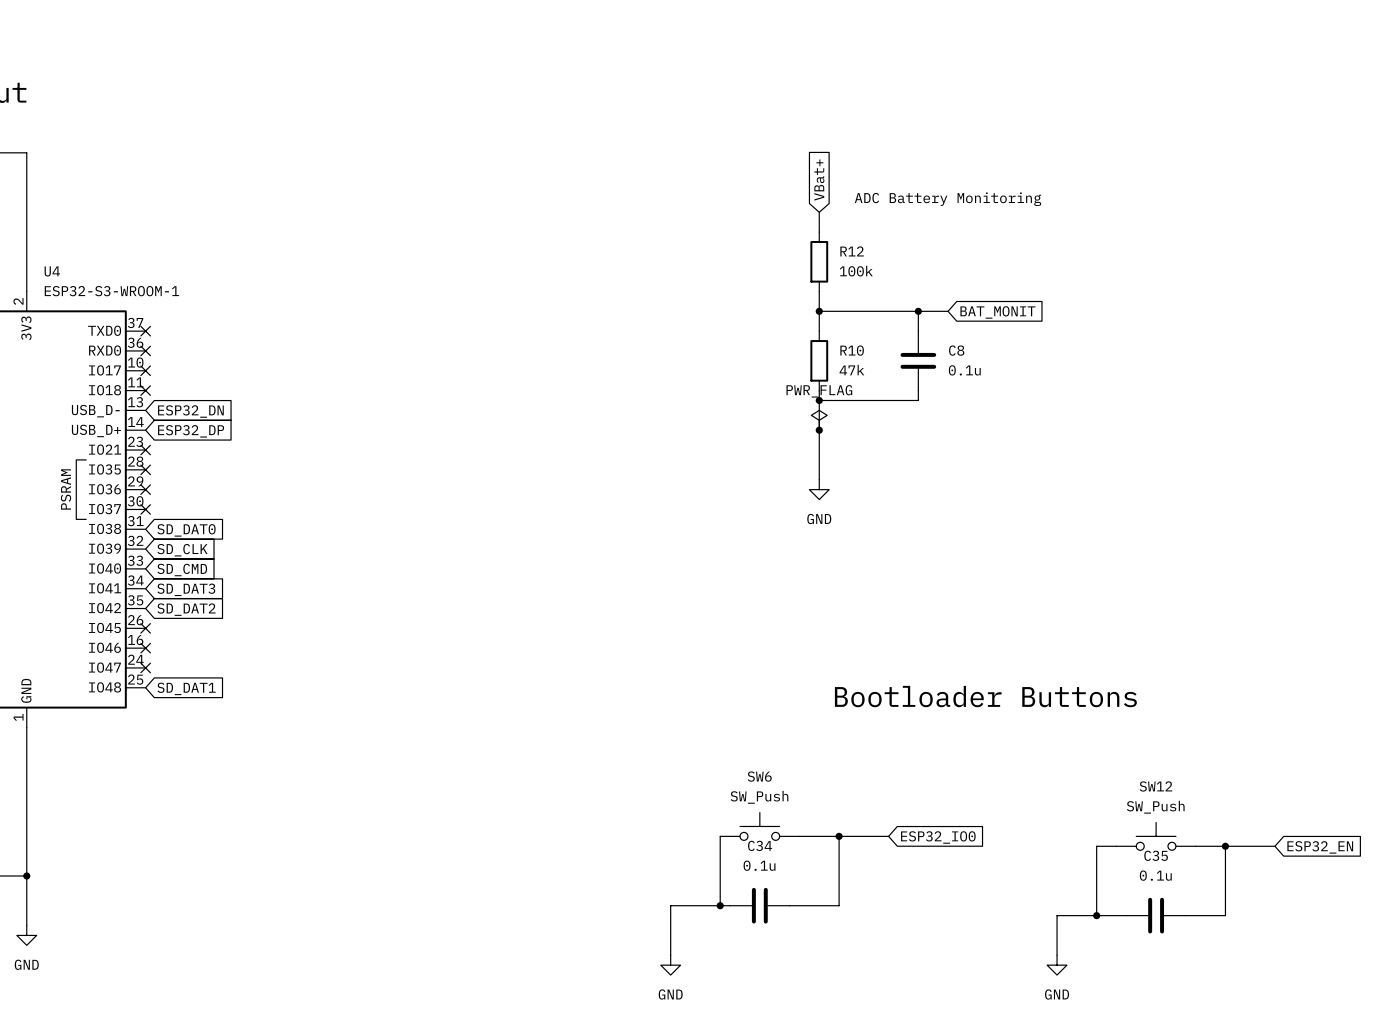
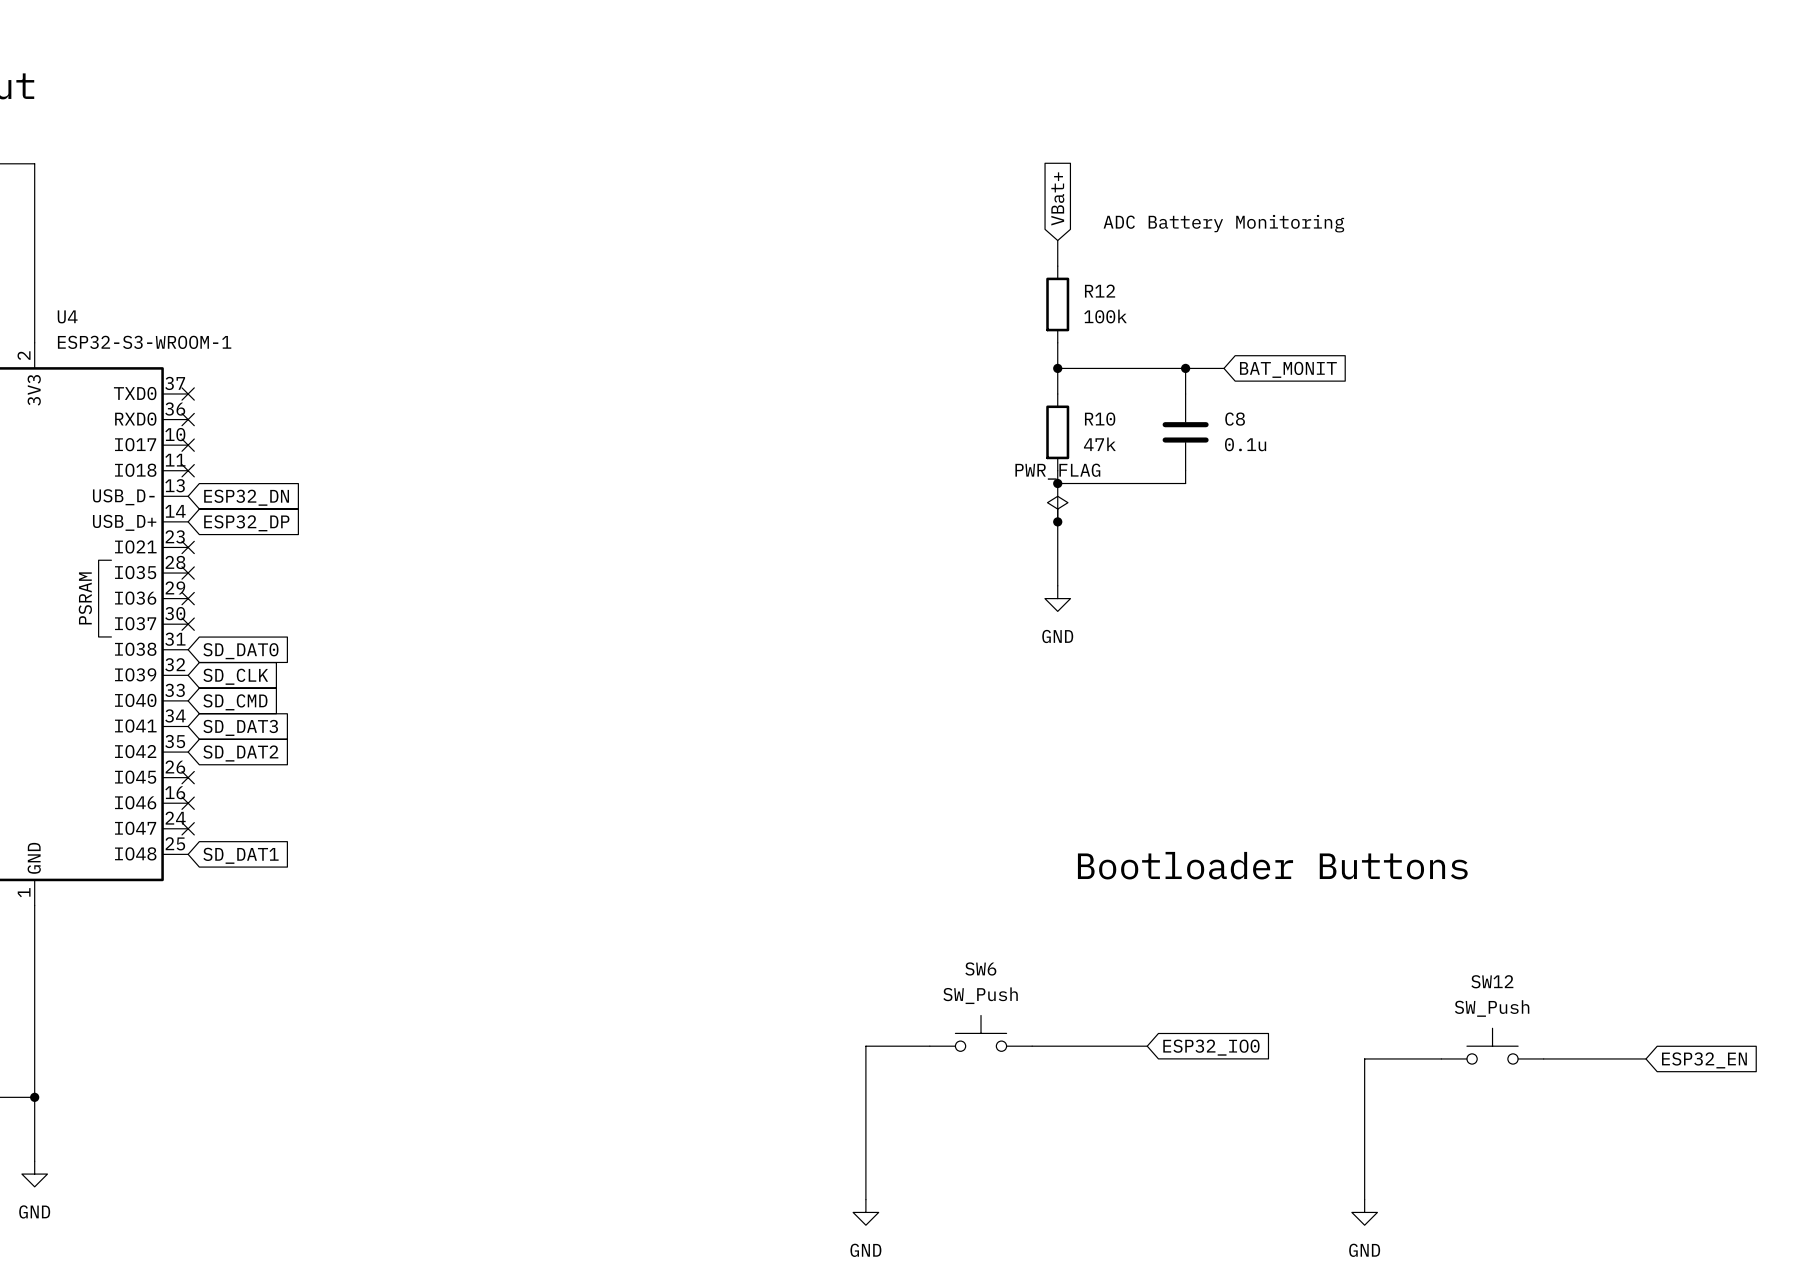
wire: (720, 836) (720, 905) -> (929, 1046) (865, 1046) (865, 1135)
wire: (839, 836) (839, 905) (789, 905) -> none
junction: (839, 836) -> none
wire: (1096, 846) (1096, 915) -> (1415, 1058) (1364, 1058) (1364, 1148)
wire: (1225, 846) (1225, 915) (1185, 915) -> none
junction: (1225, 846) -> none
wire: (670, 905) (730, 905) -> none
junction: (720, 905) -> none
C34: 0.1u (759, 905) -> none
wire: (1057, 915) (1126, 915) -> none
junction: (1096, 915) -> none
C35: 0.1u (1156, 915) -> none

